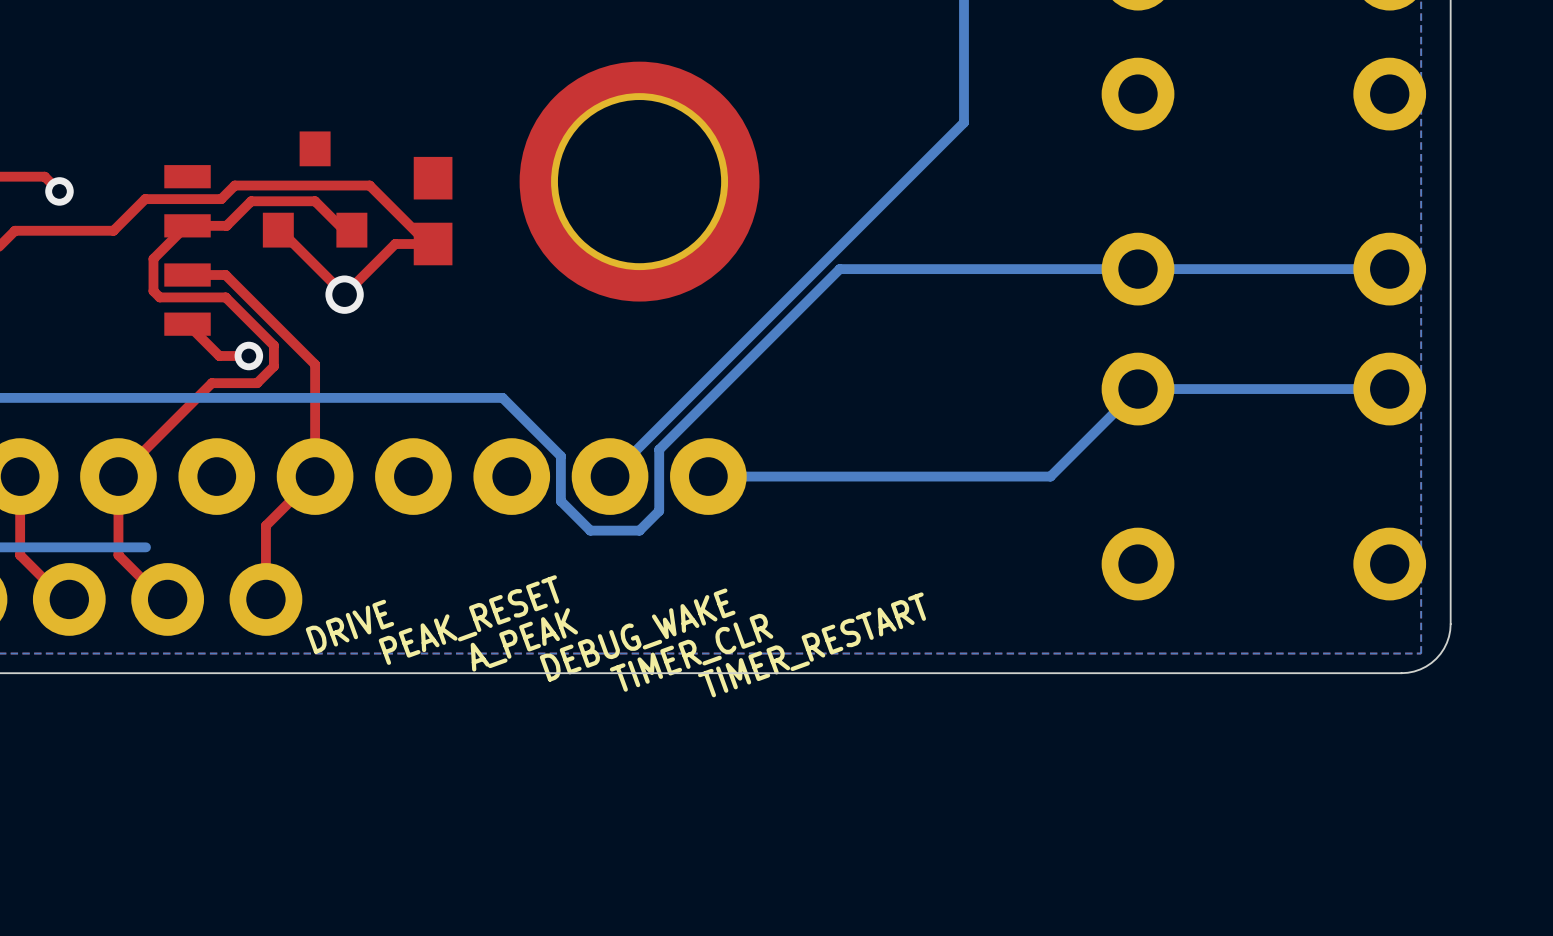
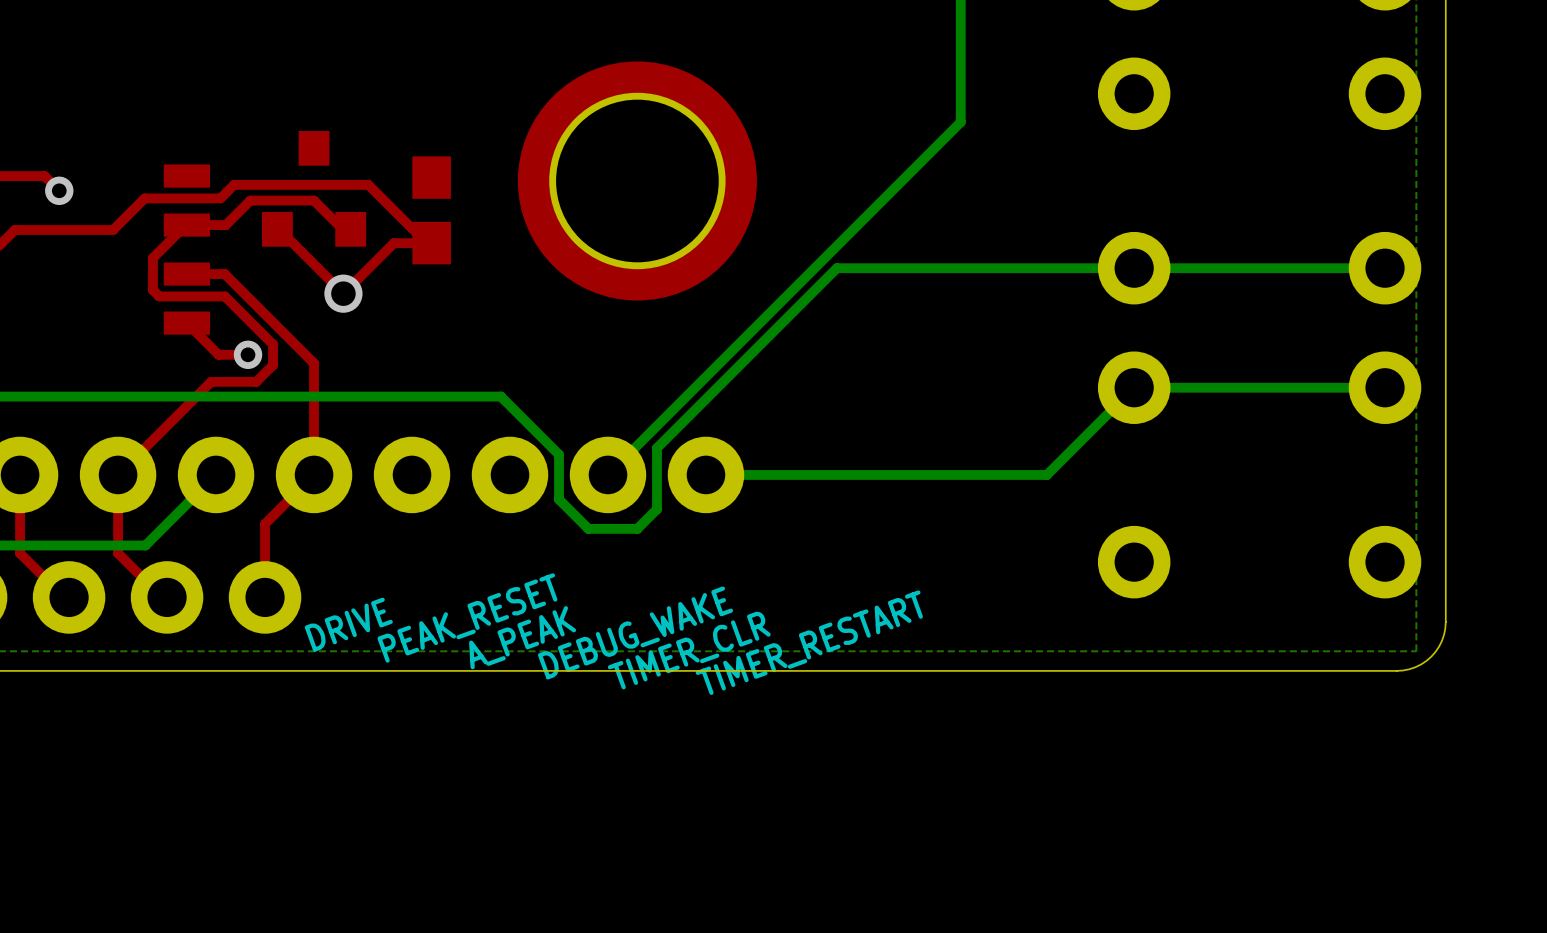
bottom track: none -> (216, 474) (145, 545)

